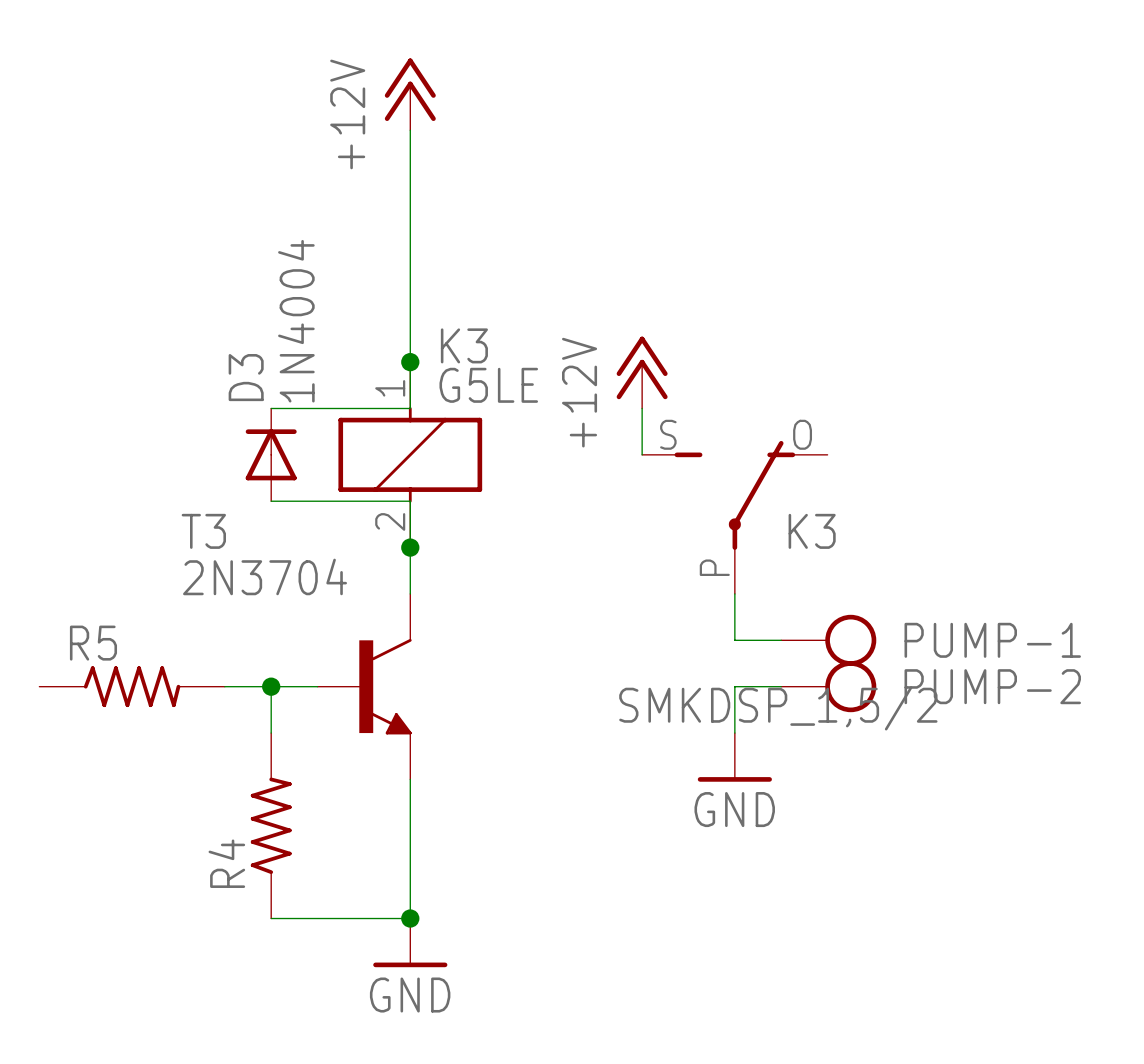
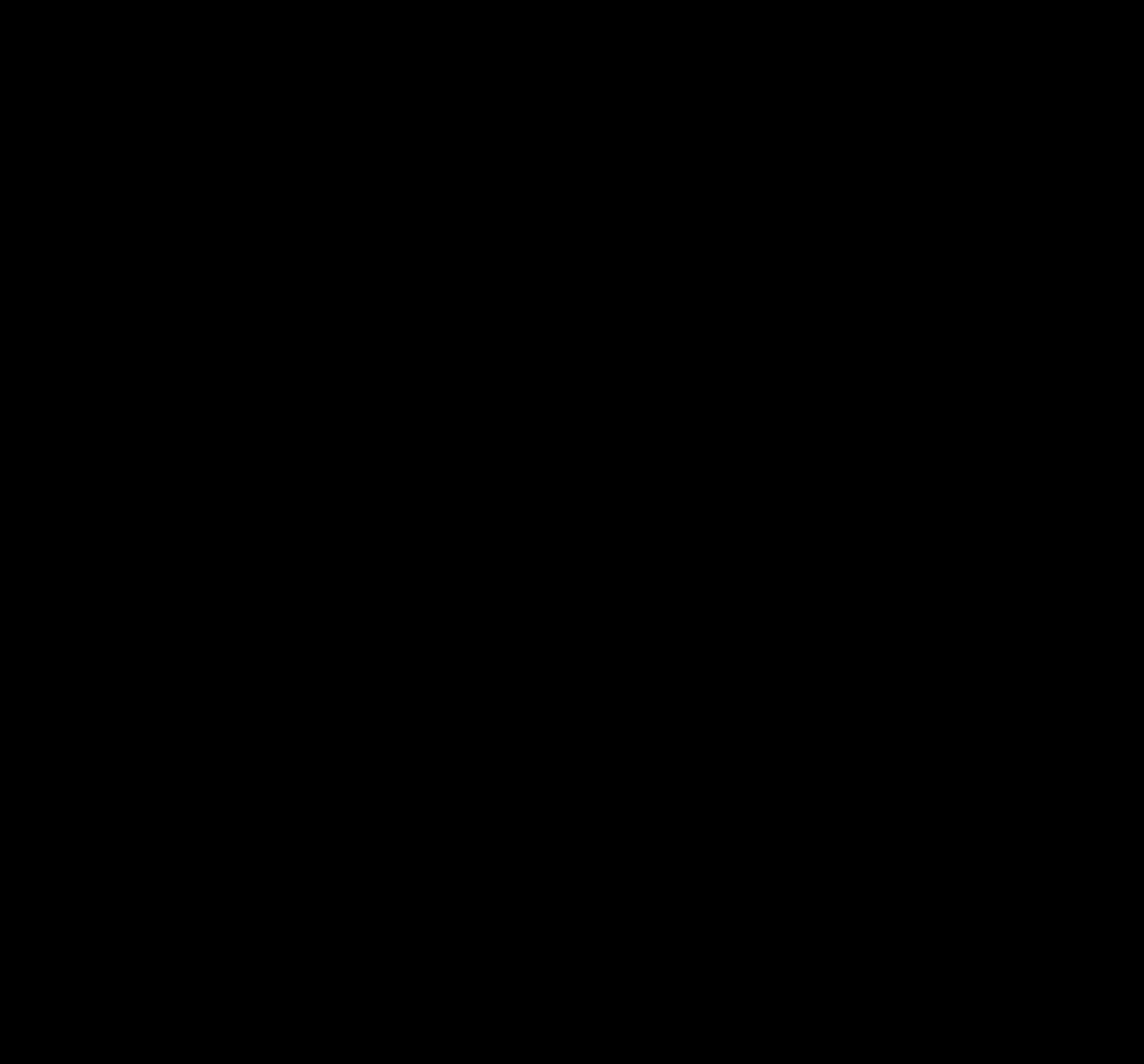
power symbol: +12V (410, 94) -> none
wire: (410, 130) (410, 408) (271, 408) -> none
junction: (410, 362) -> none
power symbol: +12V (642, 372) -> none
wire: (642, 408) (642, 454) -> none
D3: 1N4004 (271, 454) -> none
K3: G5LE (410, 454) -> none
wire: (271, 501) (410, 501) (410, 593) -> none
K3: (734, 517) -> none
junction: (410, 547) -> none
wire: (734, 593) (734, 640) (781, 640) -> none
PUMP-1: SMKDSP_1,5/2 (828, 640) -> none
R5: (132, 686) -> none
wire: (224, 686) (317, 686) -> none
wire: (271, 686) (271, 733) -> none
junction: (271, 686) -> none
T3: 2N3704 (364, 686) -> none
wire: (781, 686) (734, 686) (734, 733) -> none
PUMP-2: (828, 686) -> none
power symbol: GND (734, 757) -> none
wire: (410, 779) (410, 918) (271, 918) -> none
R4: (271, 825) -> none
junction: (410, 918) -> none
power symbol: GND (410, 942) -> none

